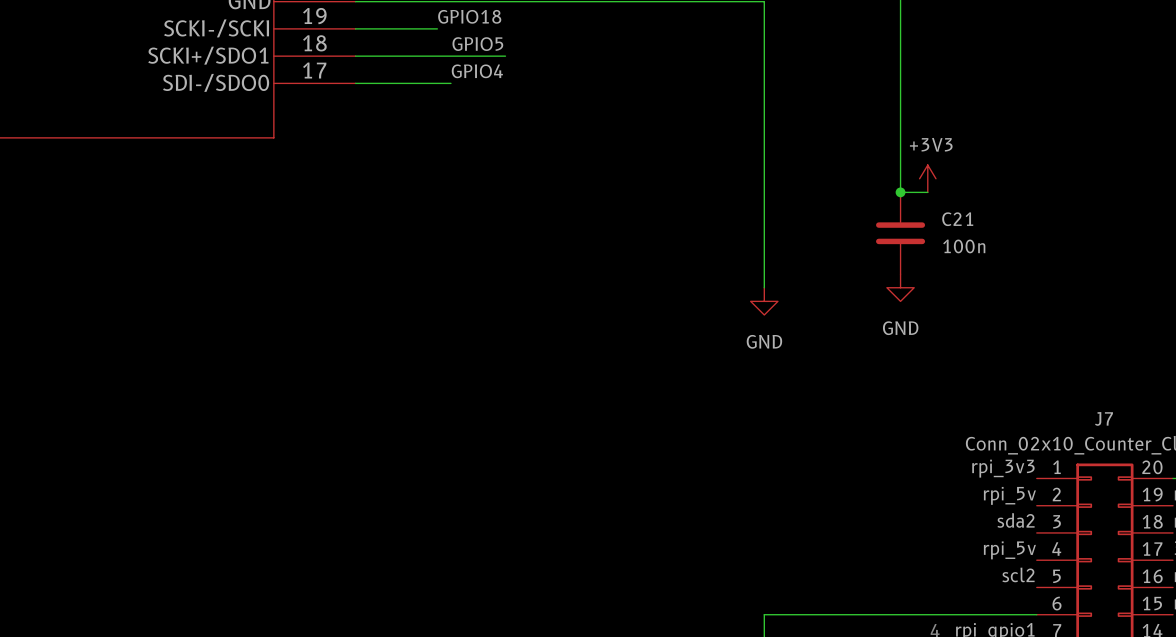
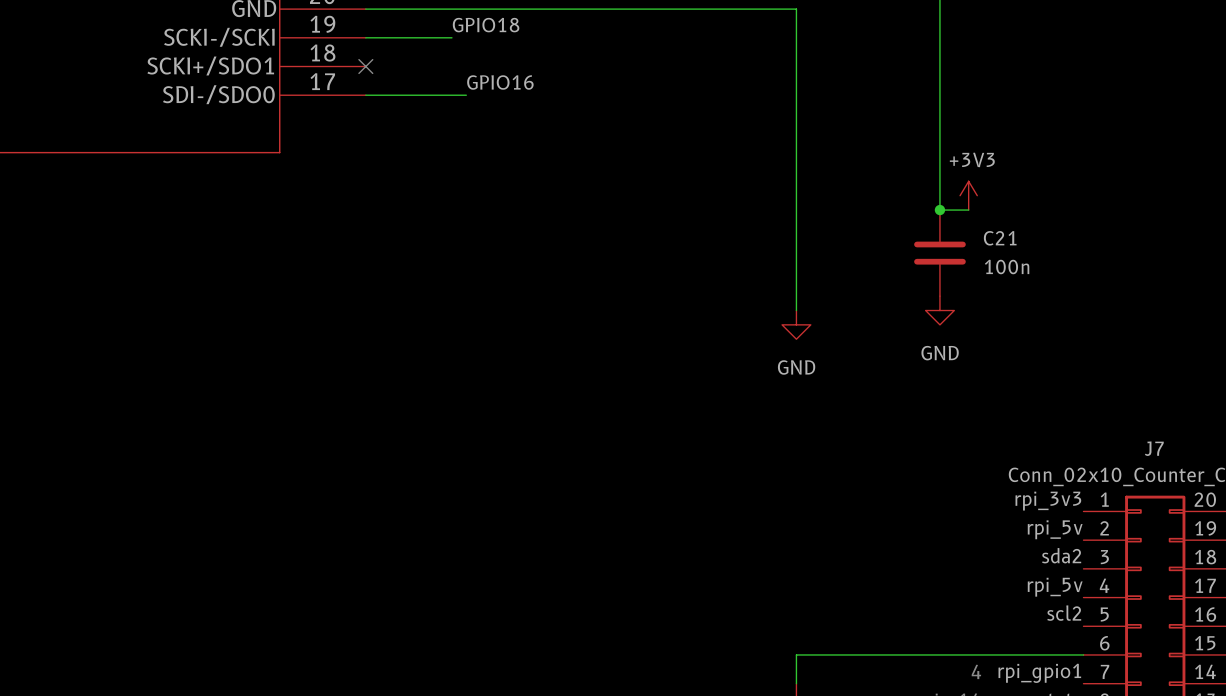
label: GPIO5 (477, 44) -> none
wire: (355, 56) (505, 56) -> none
no-connect mark: none -> (365, 66)
label: GPIO4 (477, 71) -> GPIO16 (500, 82)

